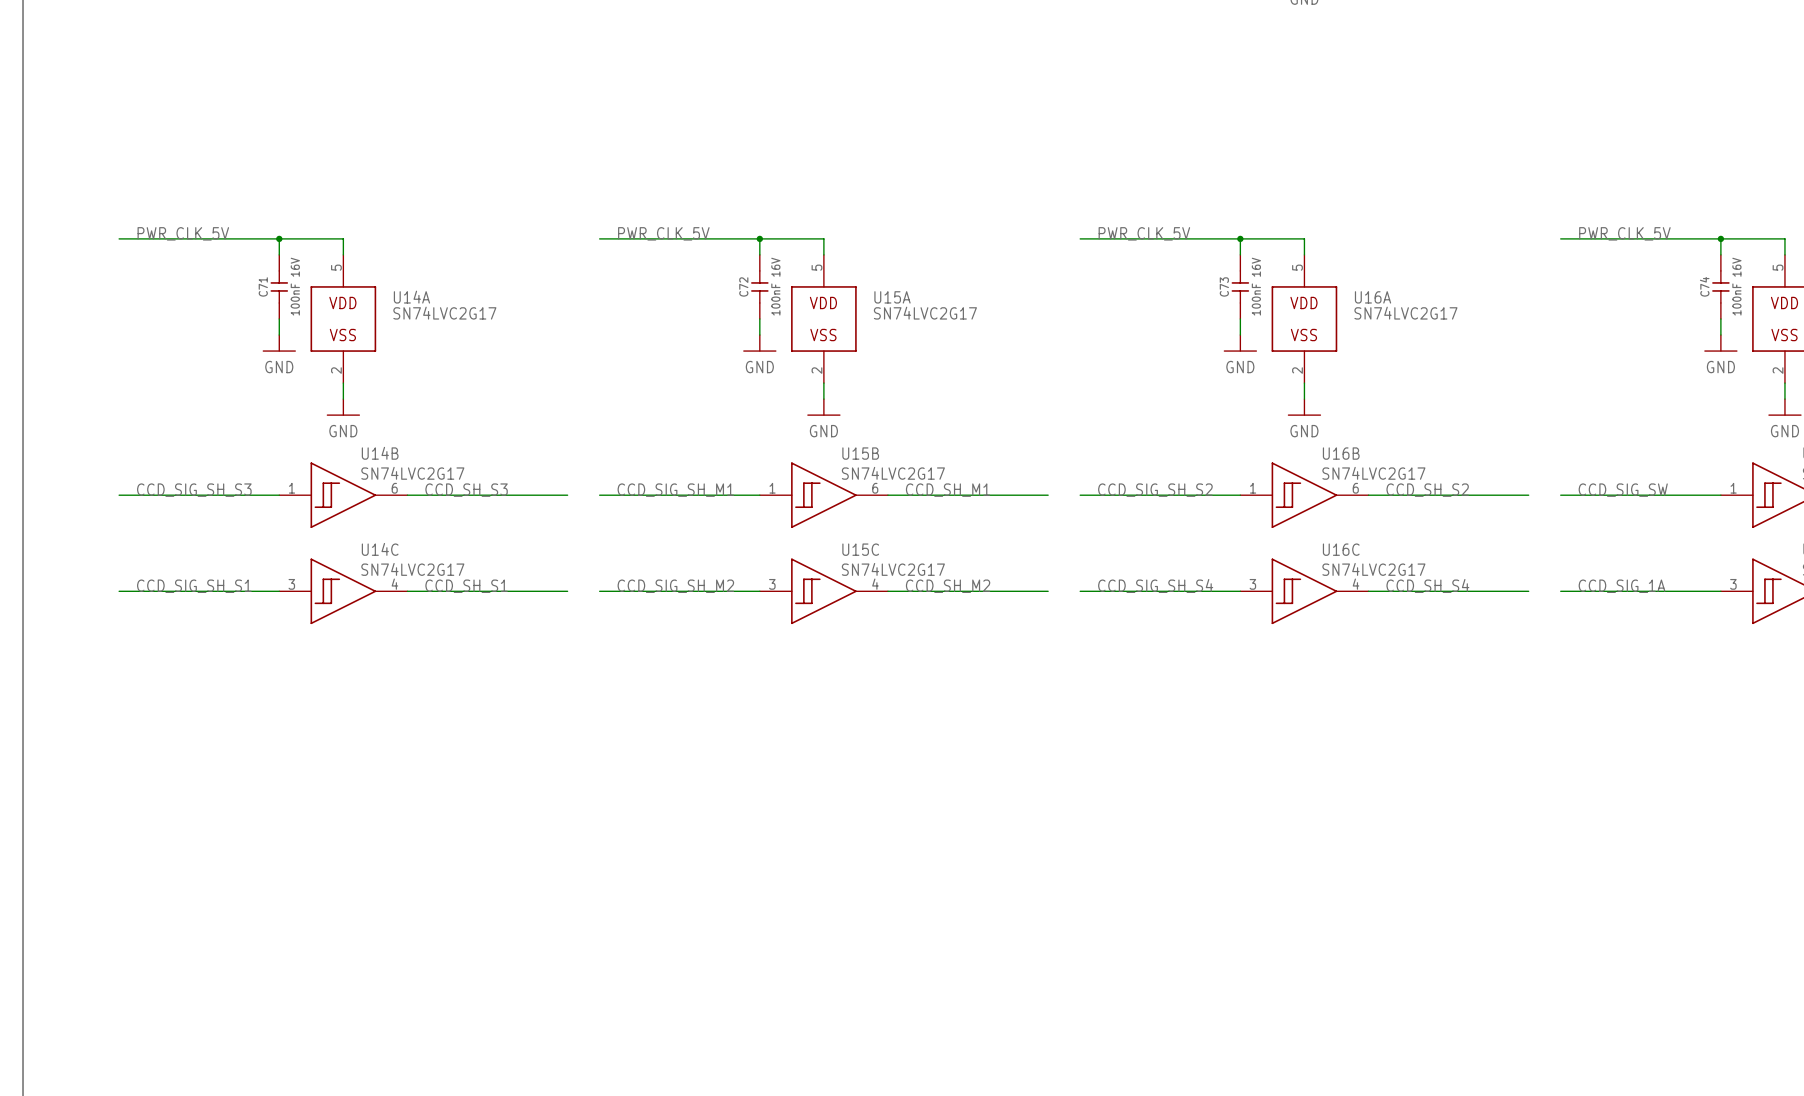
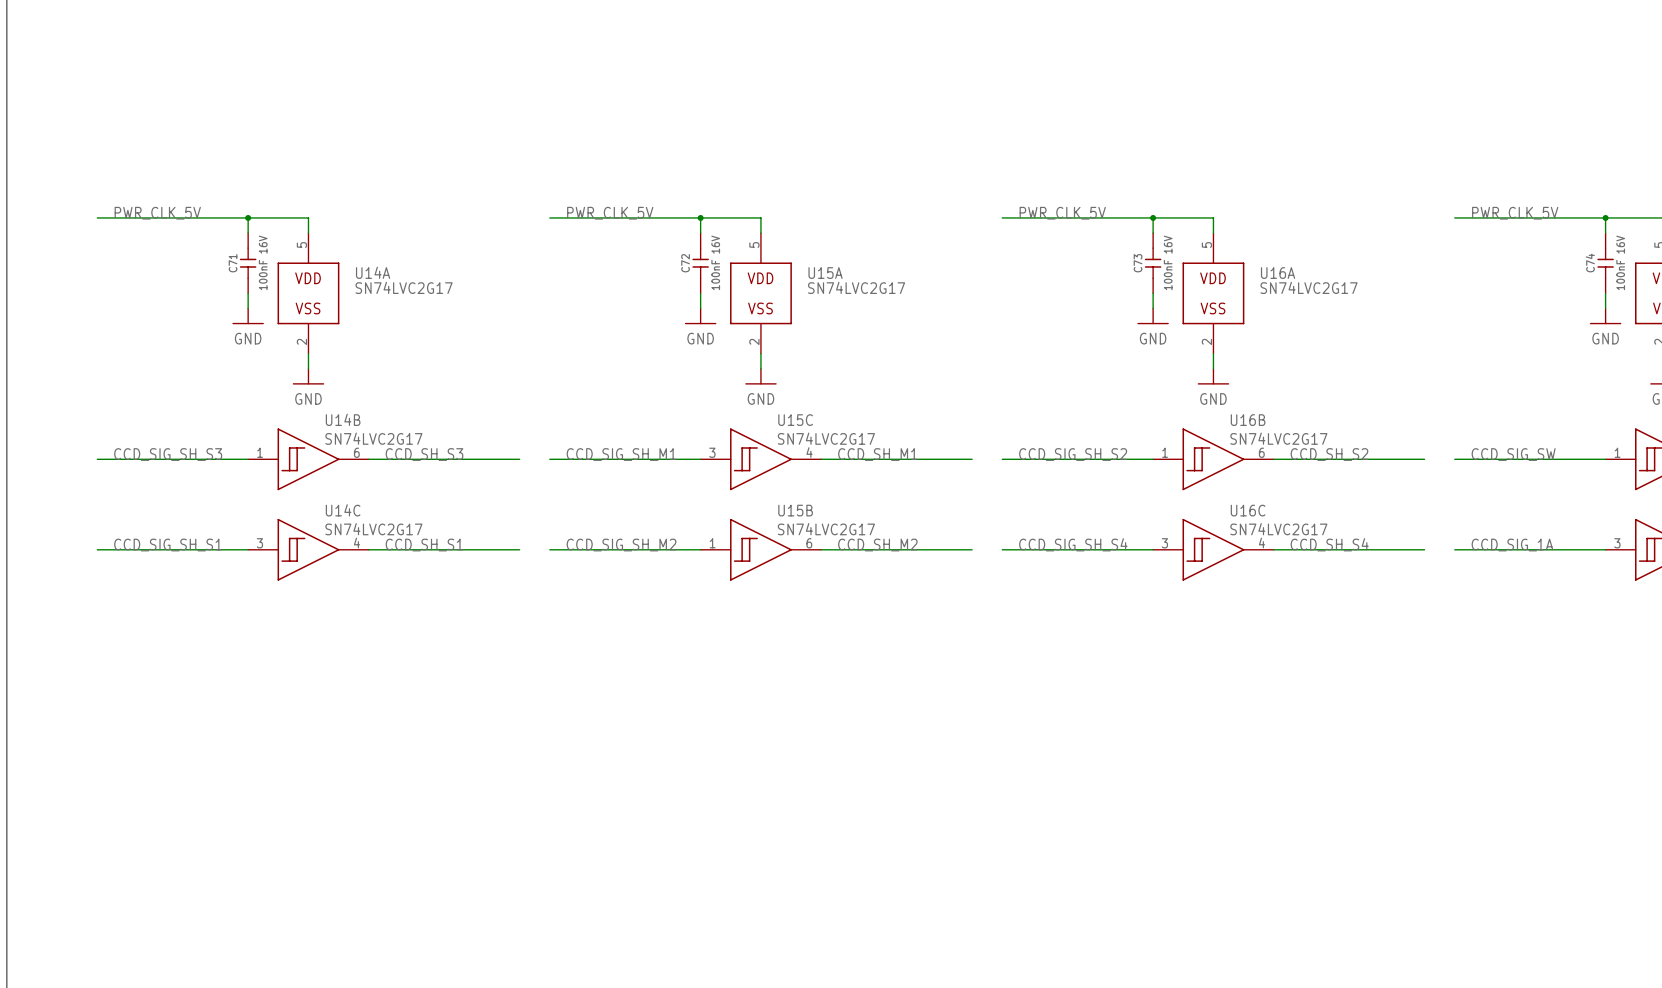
U15B position: (823, 495) -> (760, 549)
U15C position: (823, 591) -> (760, 459)

